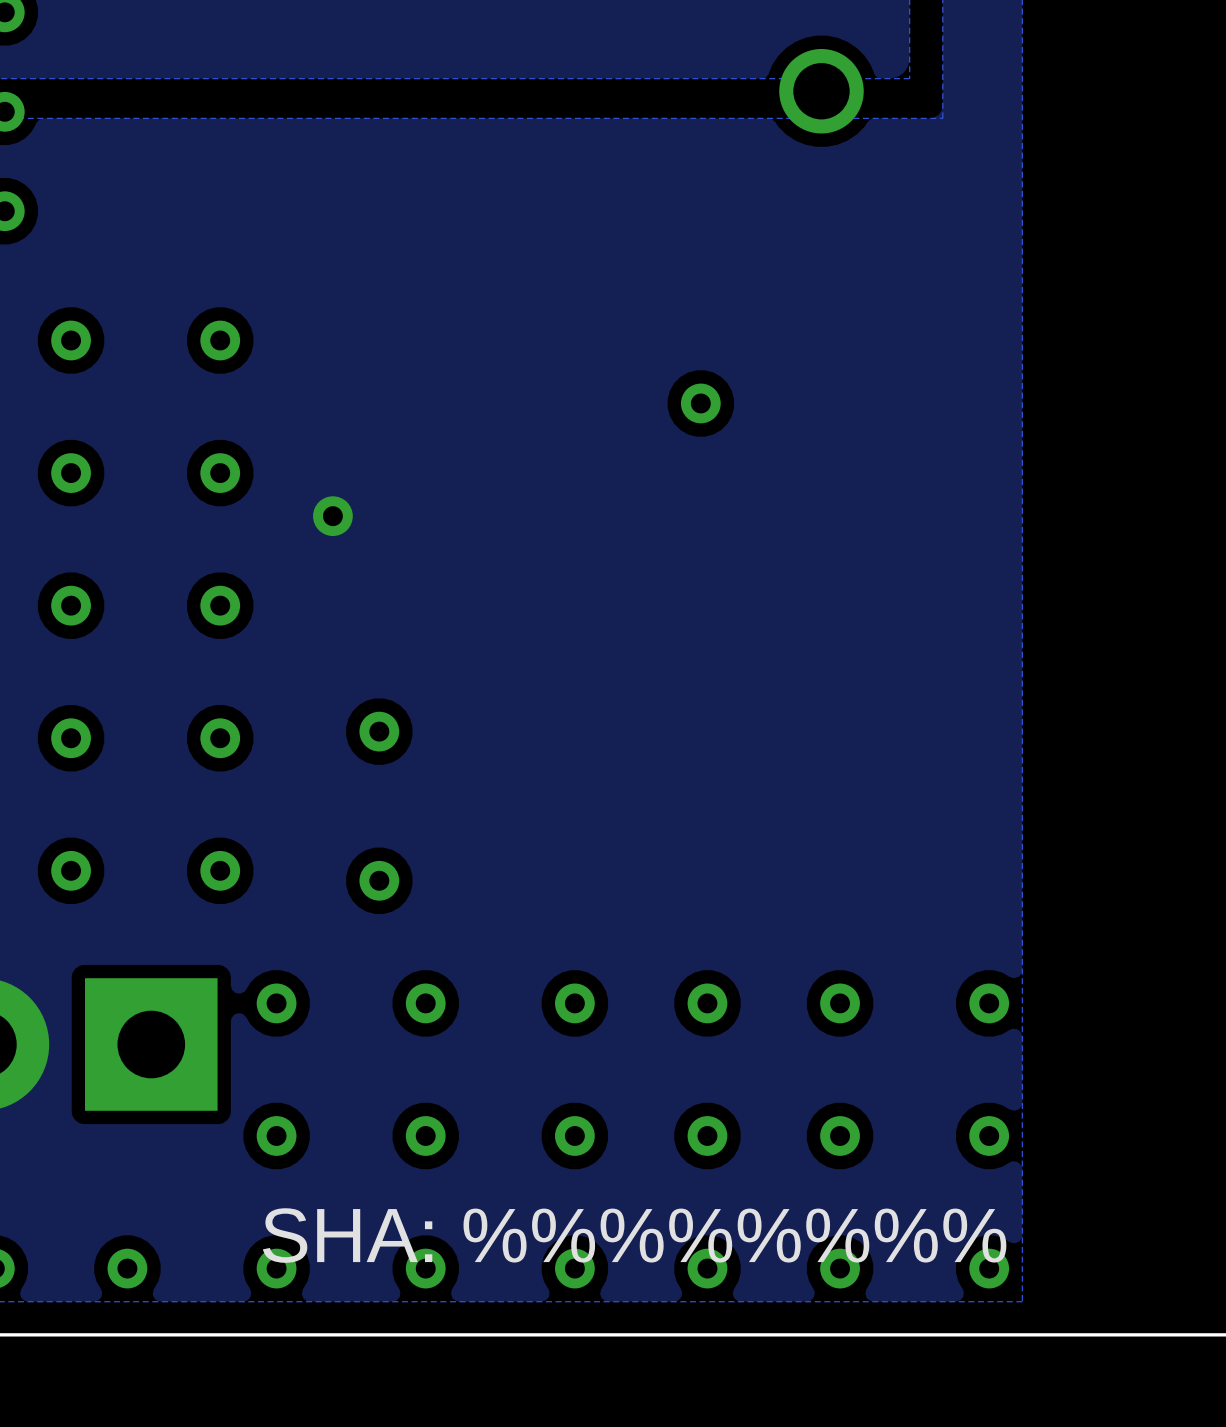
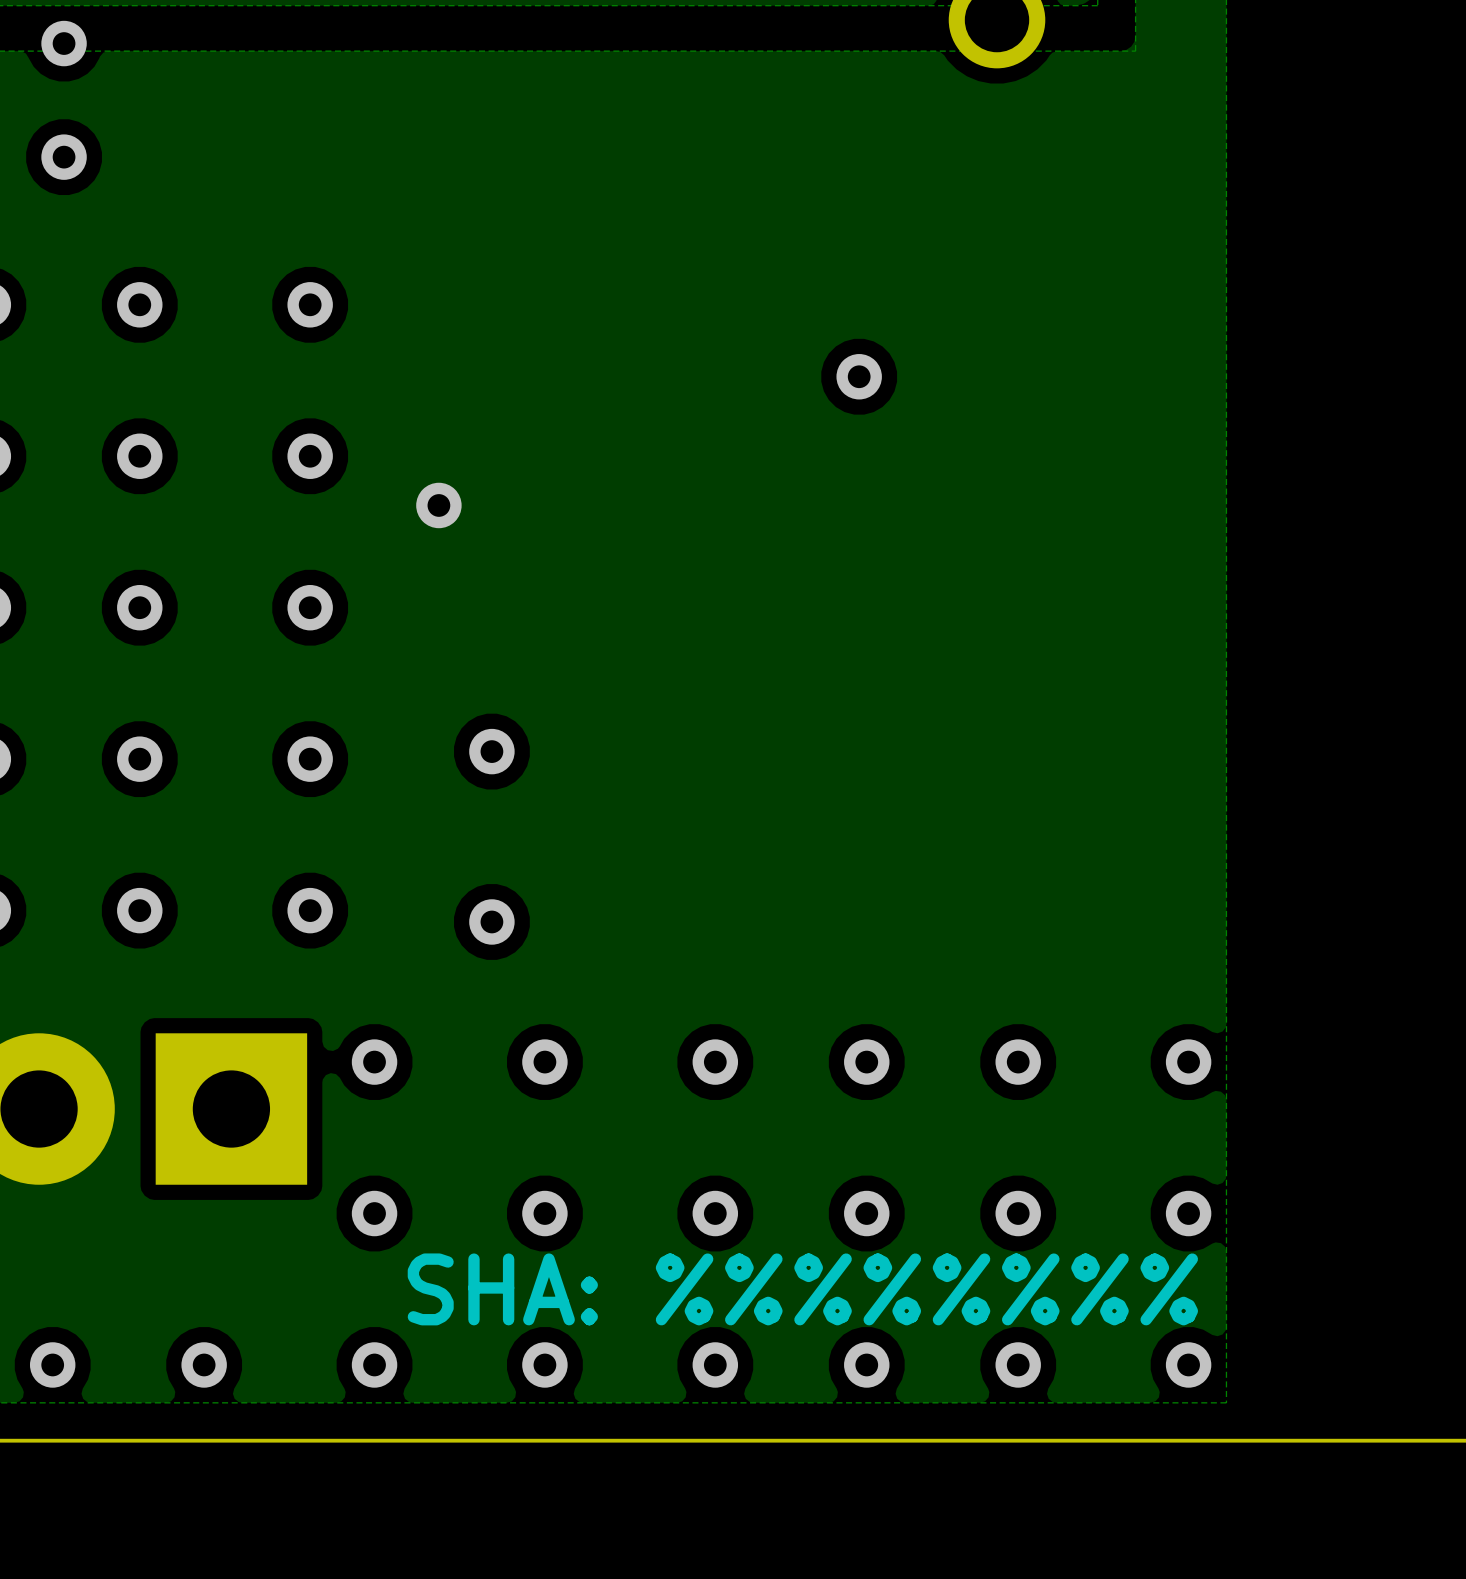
text position: SHA: %%%%%%%% (634, 1235) -> SHA: %%%%%%%% (802, 1289)

